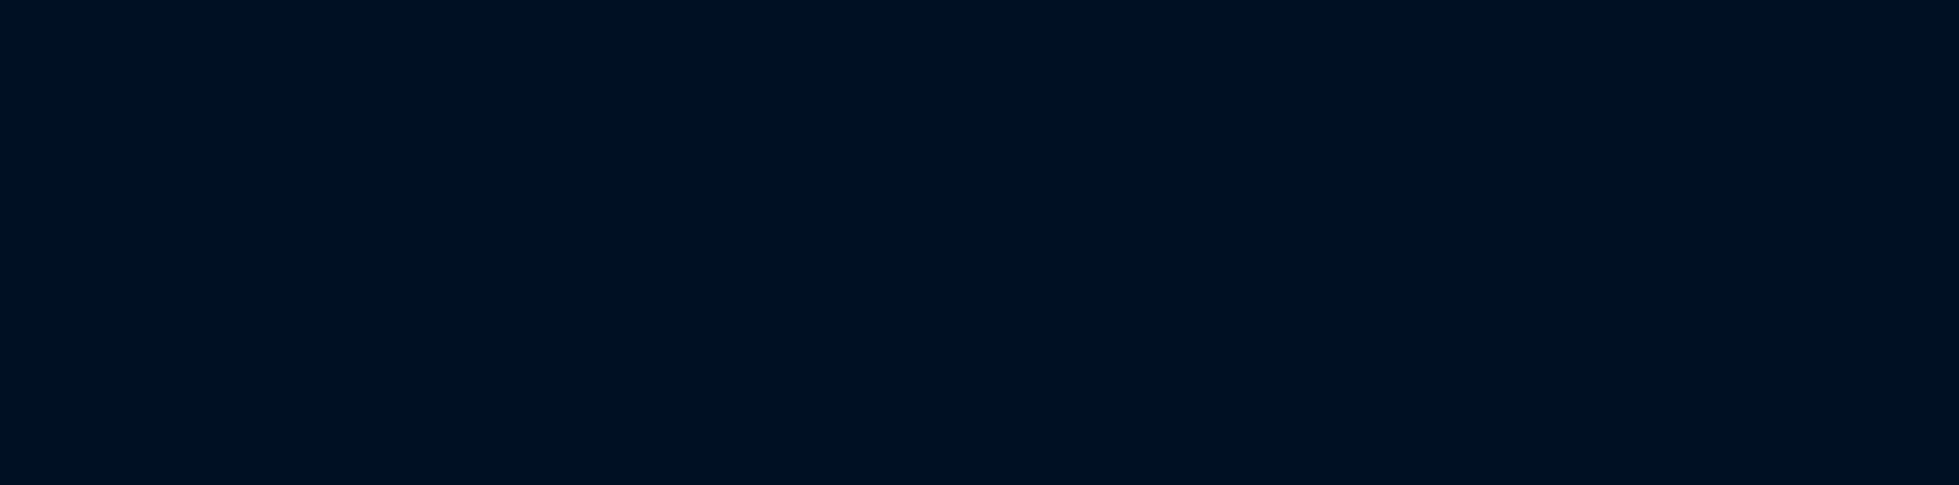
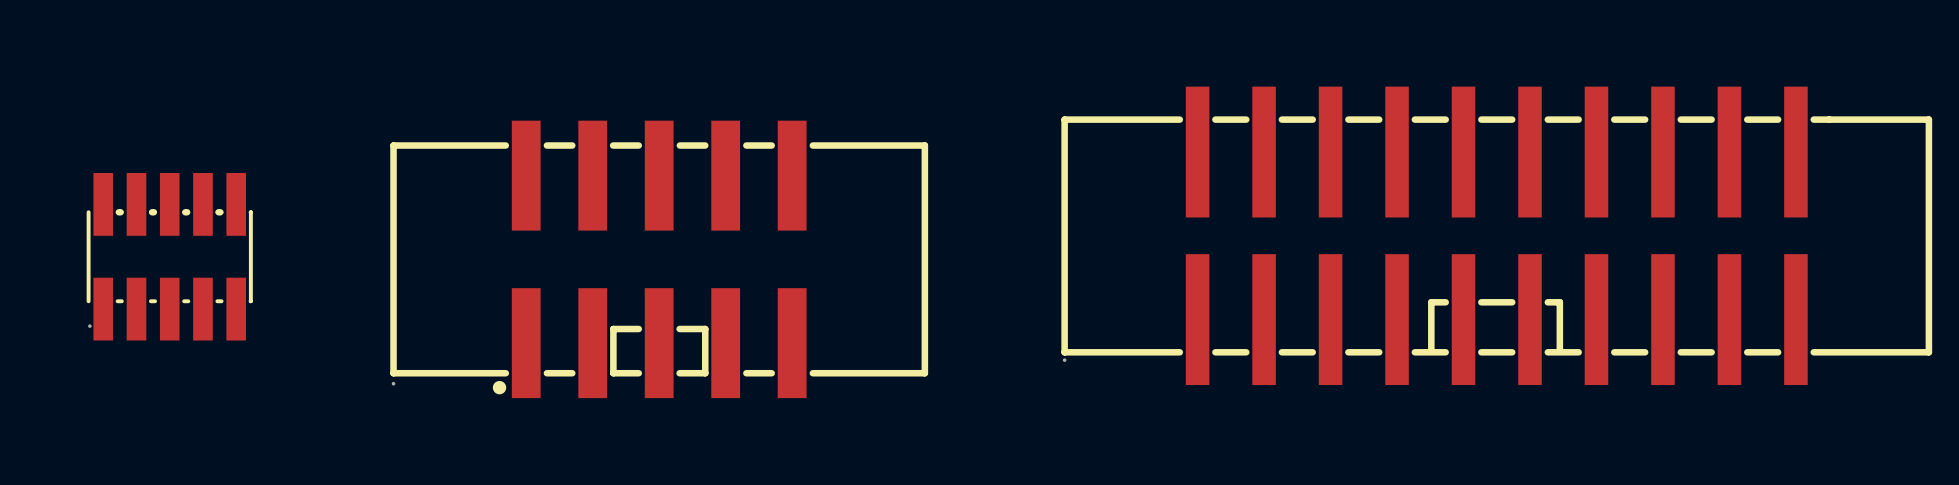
part: none -> (1496, 235)
part: none -> (169, 256)
part: none -> (659, 259)

